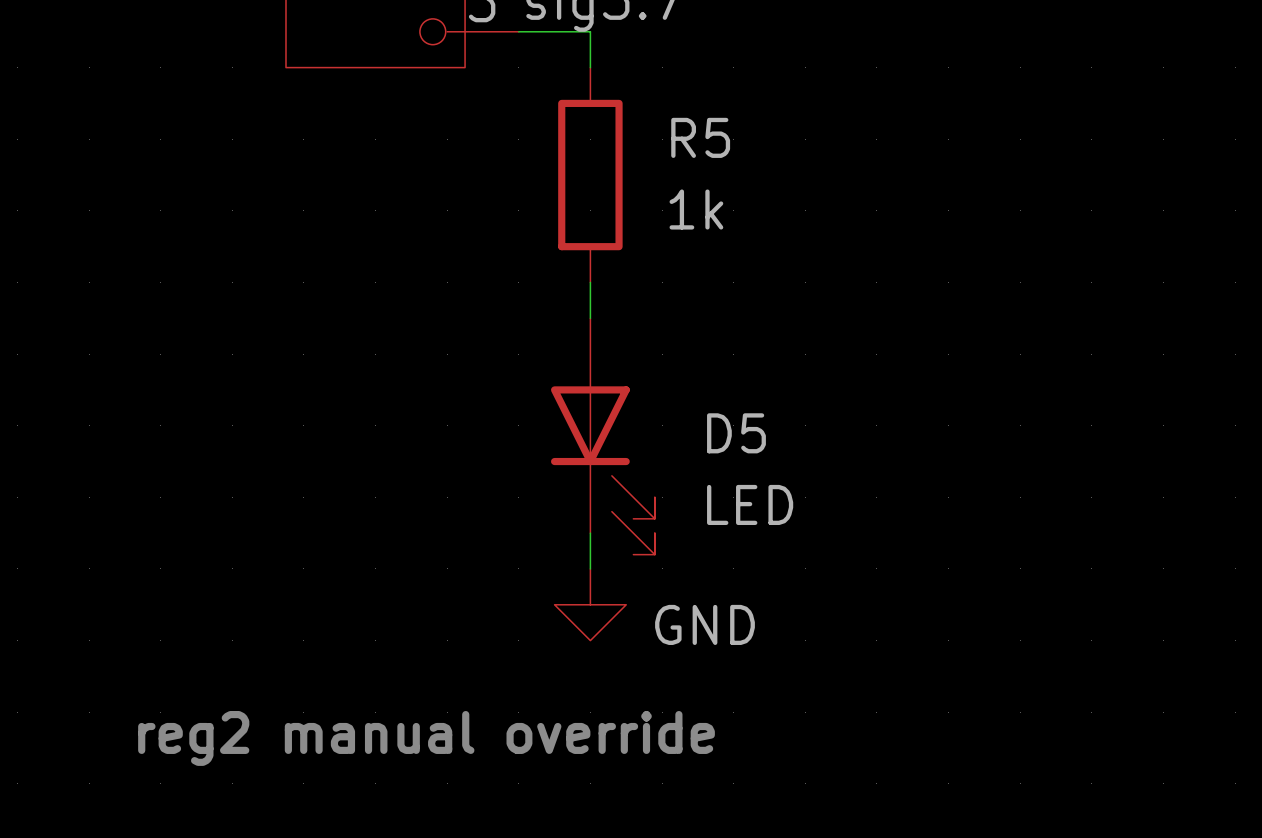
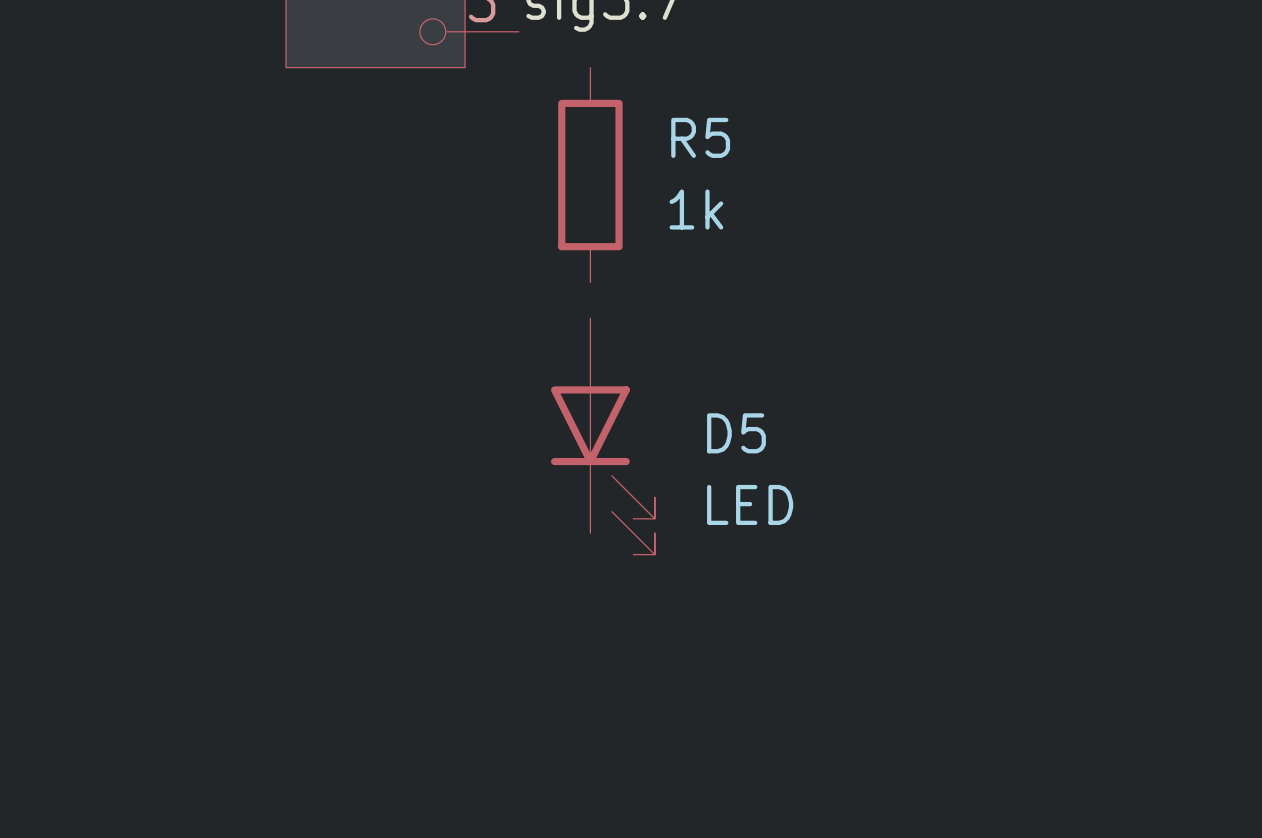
wire: (518, 31) (590, 31) (590, 67) -> none
wire: (590, 282) (590, 318) -> none
wire: (590, 533) (590, 568) -> none
power symbol: GND (590, 604) -> none
text: reg2 manual override (426, 738) -> none

